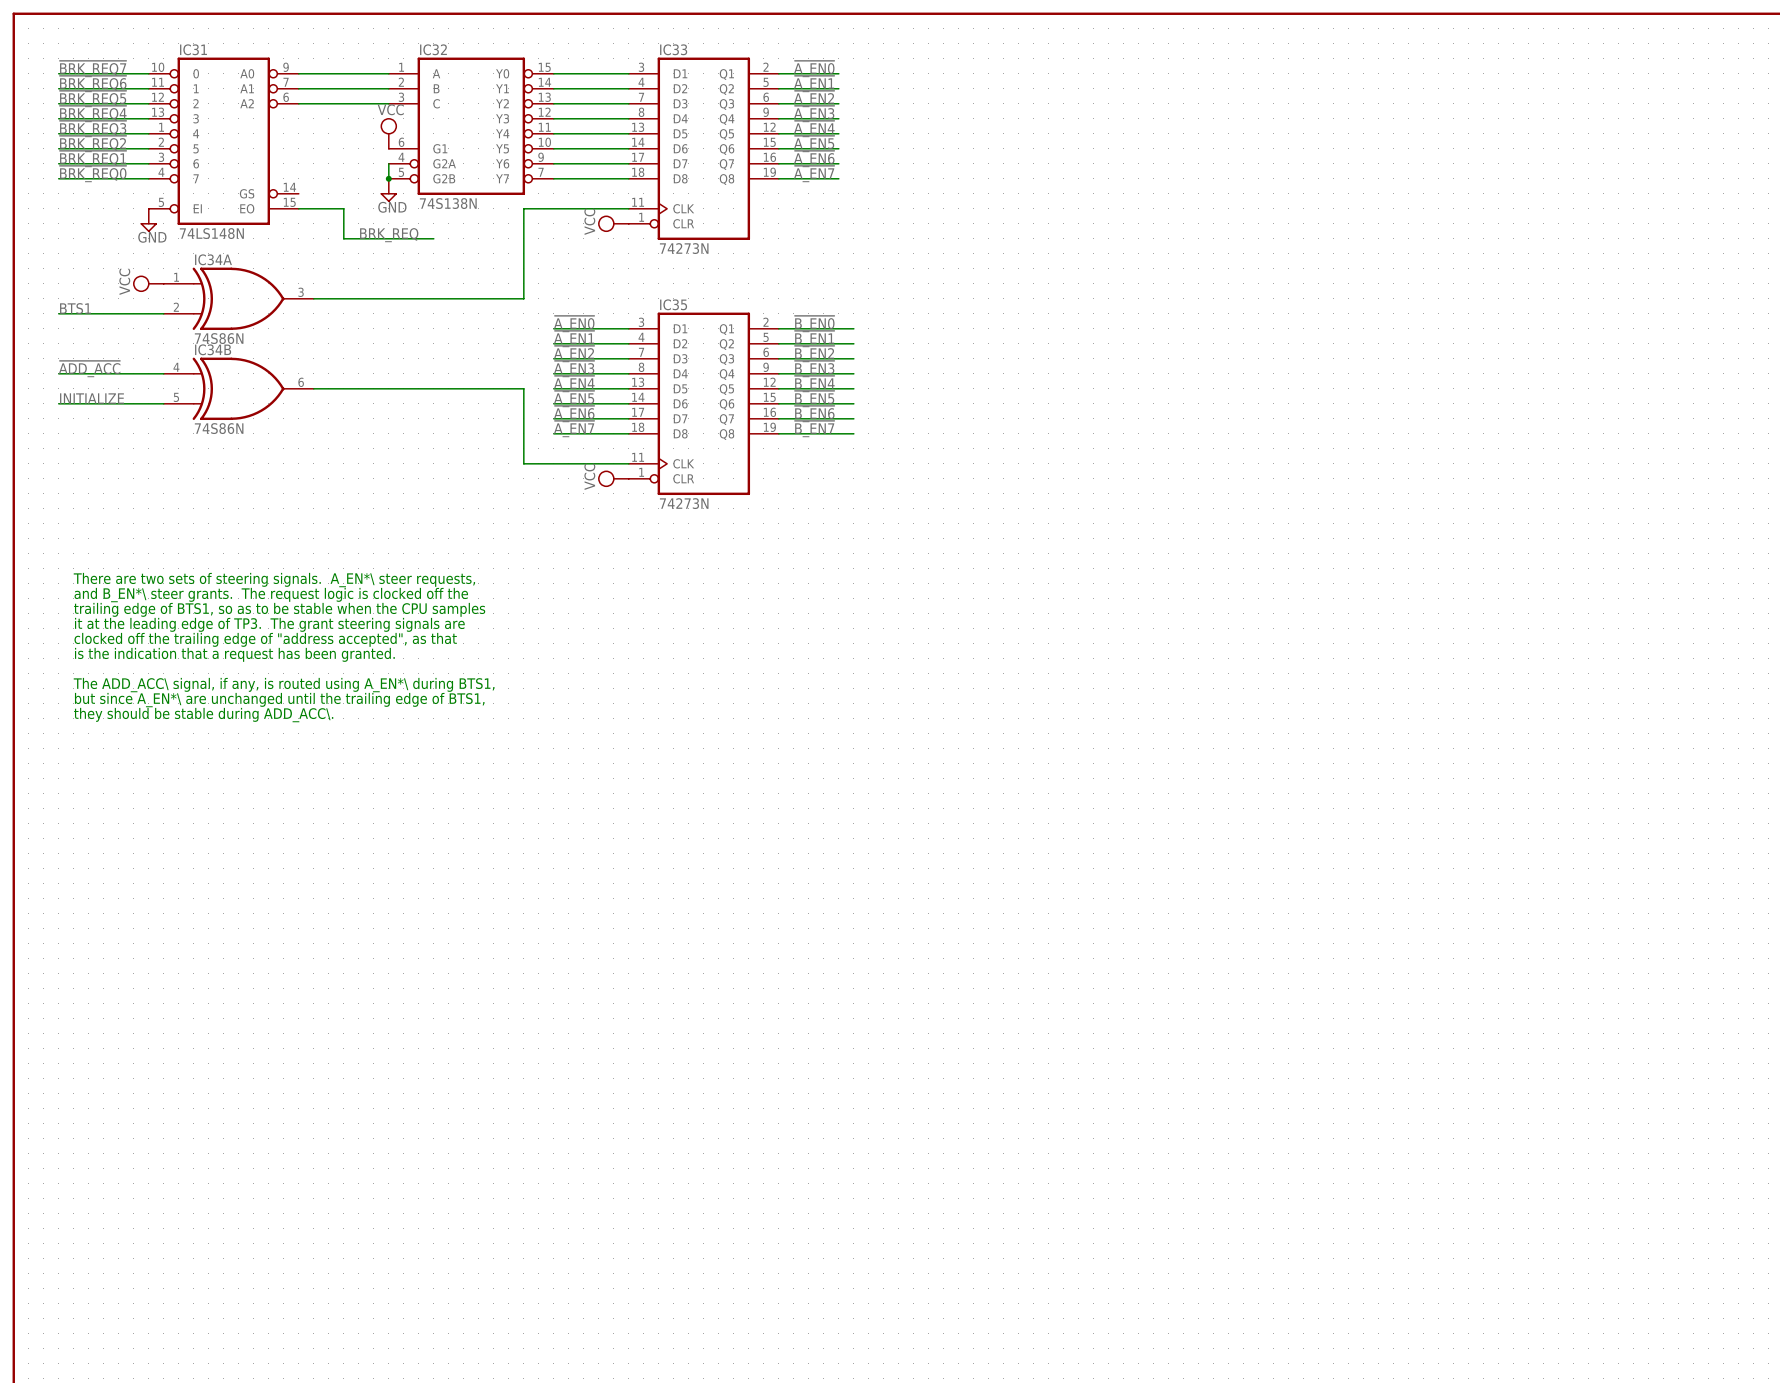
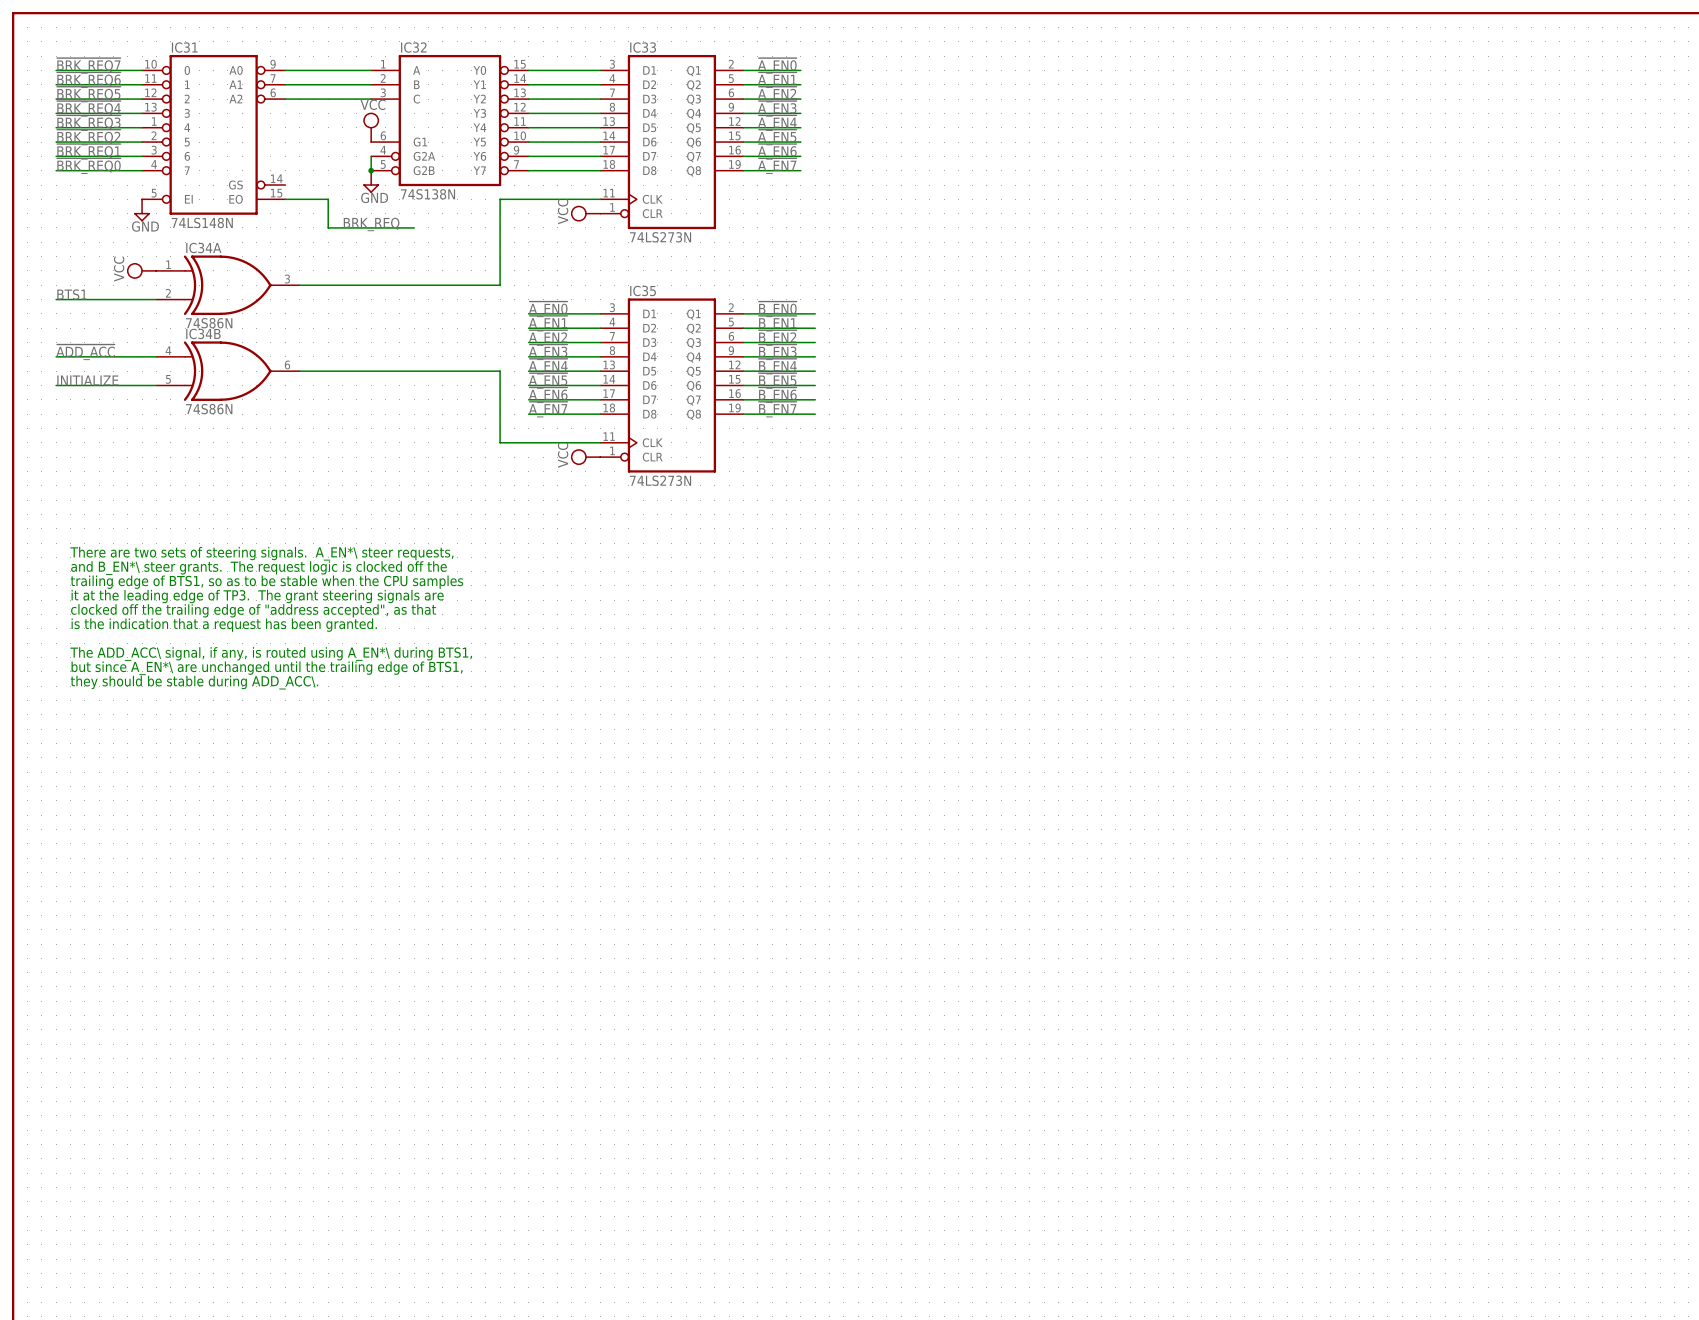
IC33 value: 74273N (684, 248) -> 74LS273N (660, 237)
IC35 value: 74273N (684, 503) -> 74LS273N (660, 480)

